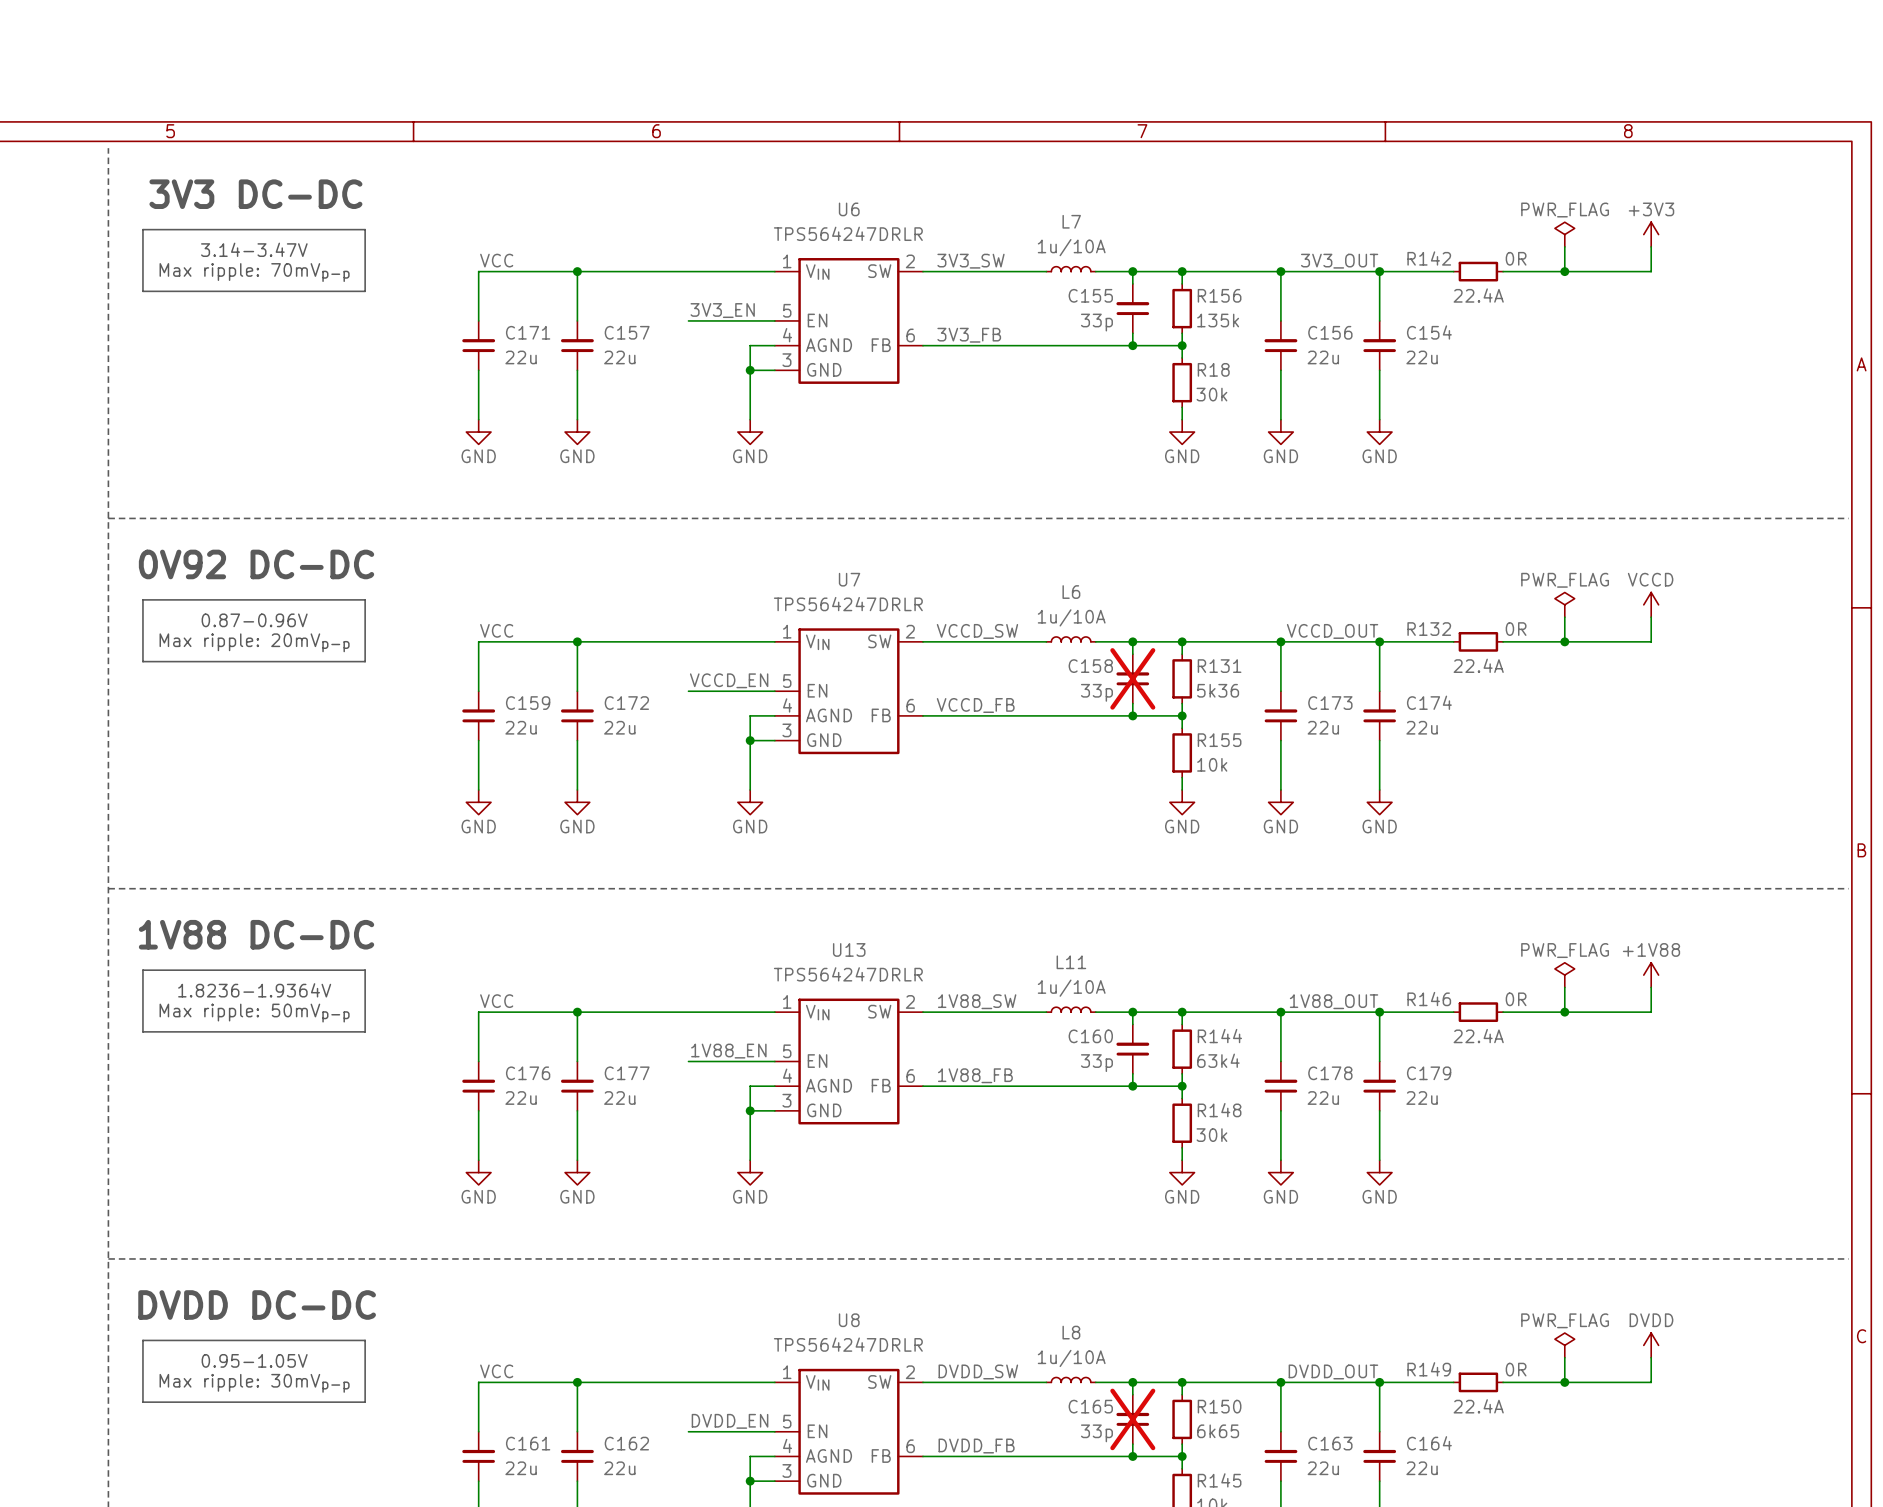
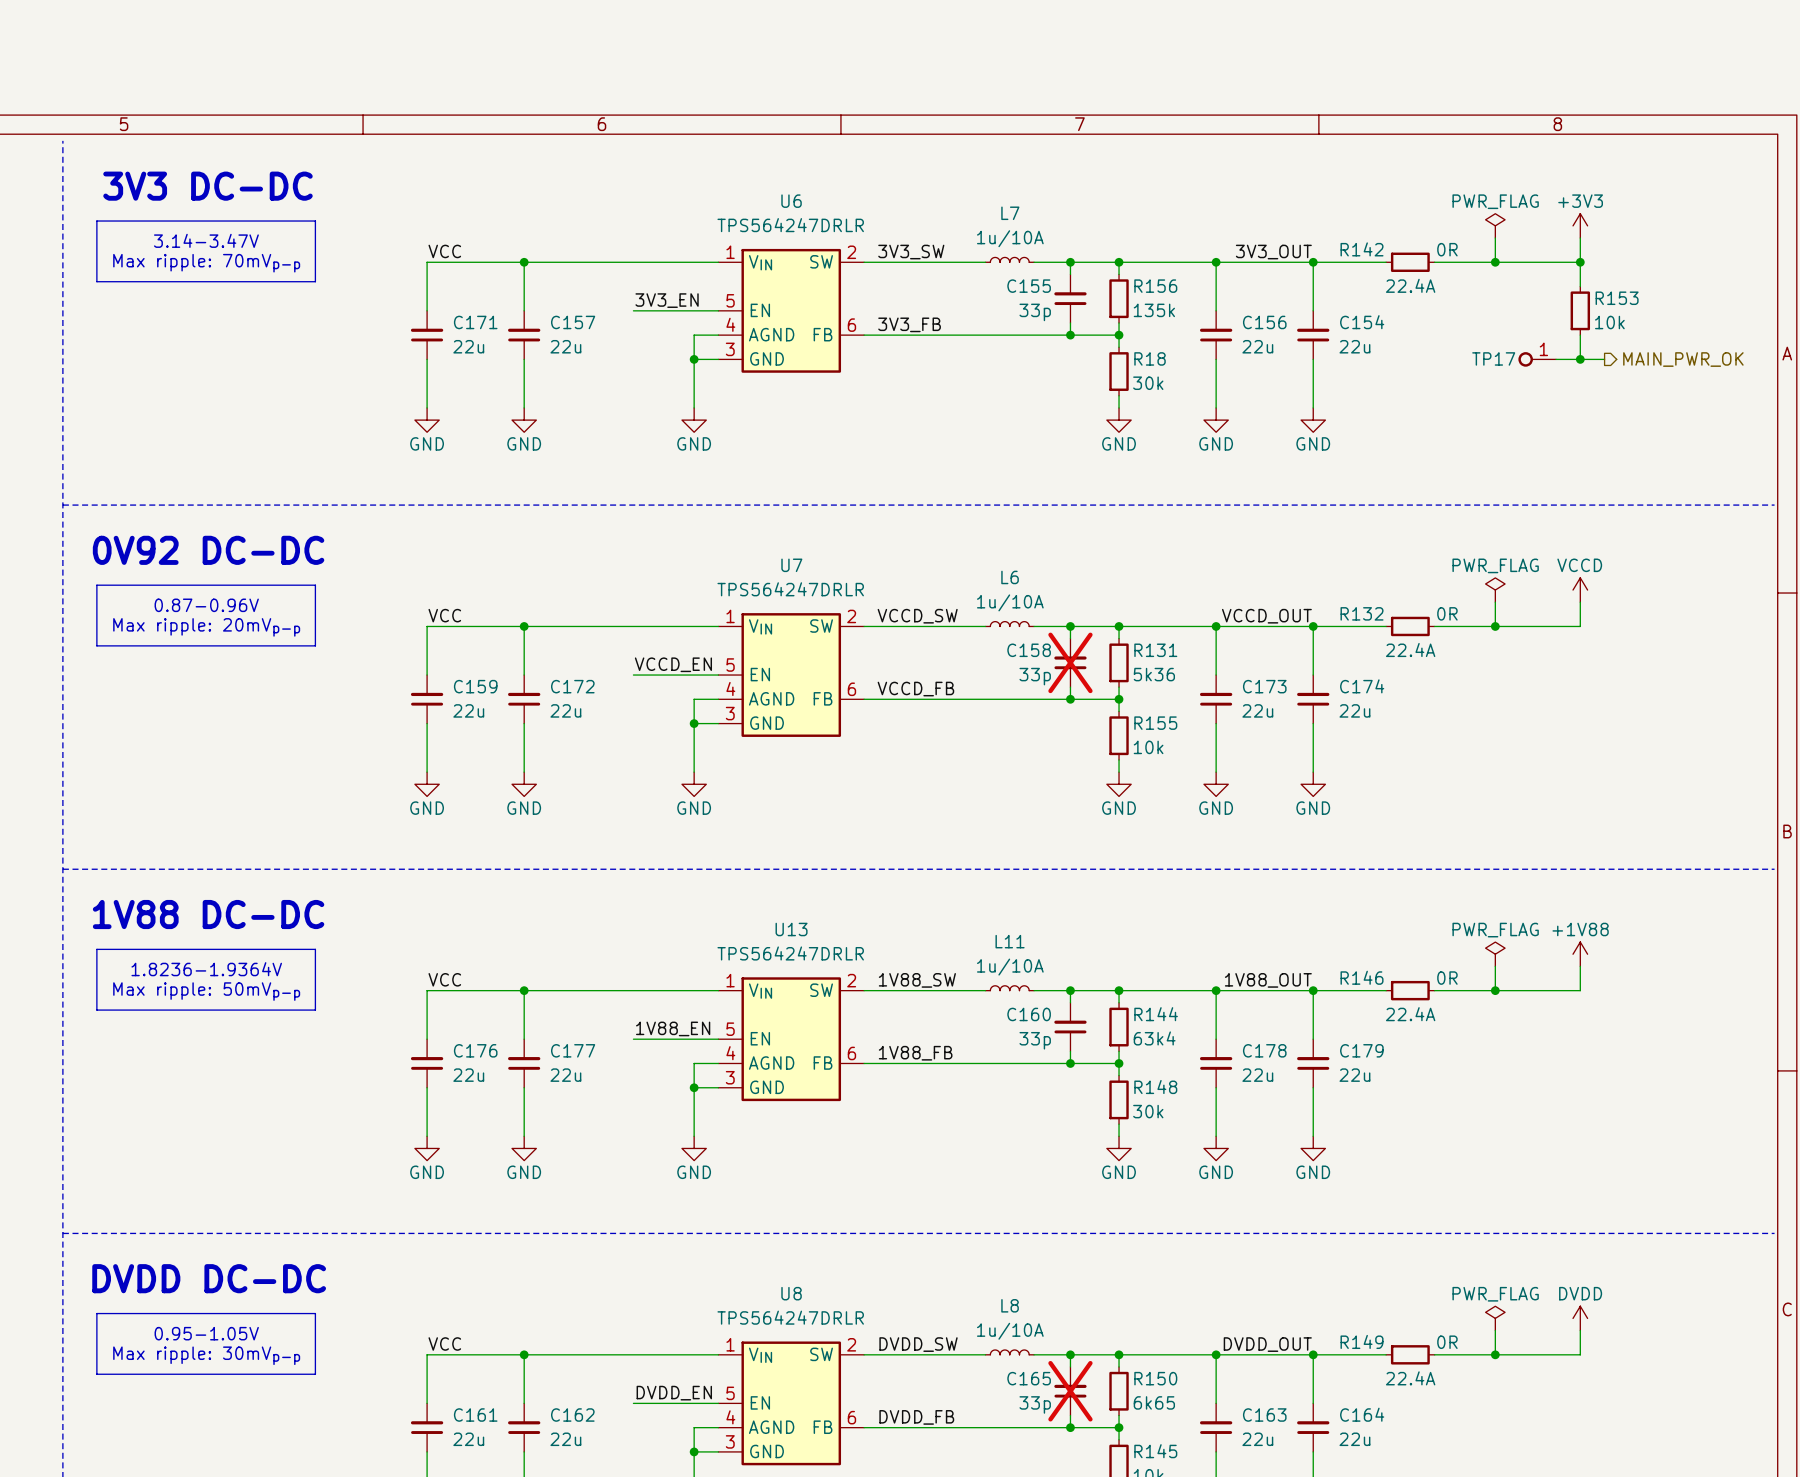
wire: none -> (1580, 262) (1580, 286)
junction: none -> (1580, 262)
R153: none -> (1580, 310)
wire: none -> (1580, 335) (1580, 359)
TP17: none -> (1537, 359)
wire: none -> (1556, 359) (1604, 359)
junction: none -> (1580, 359)
hierarchical label: none -> MAIN_PWR_OK (1683, 359)

